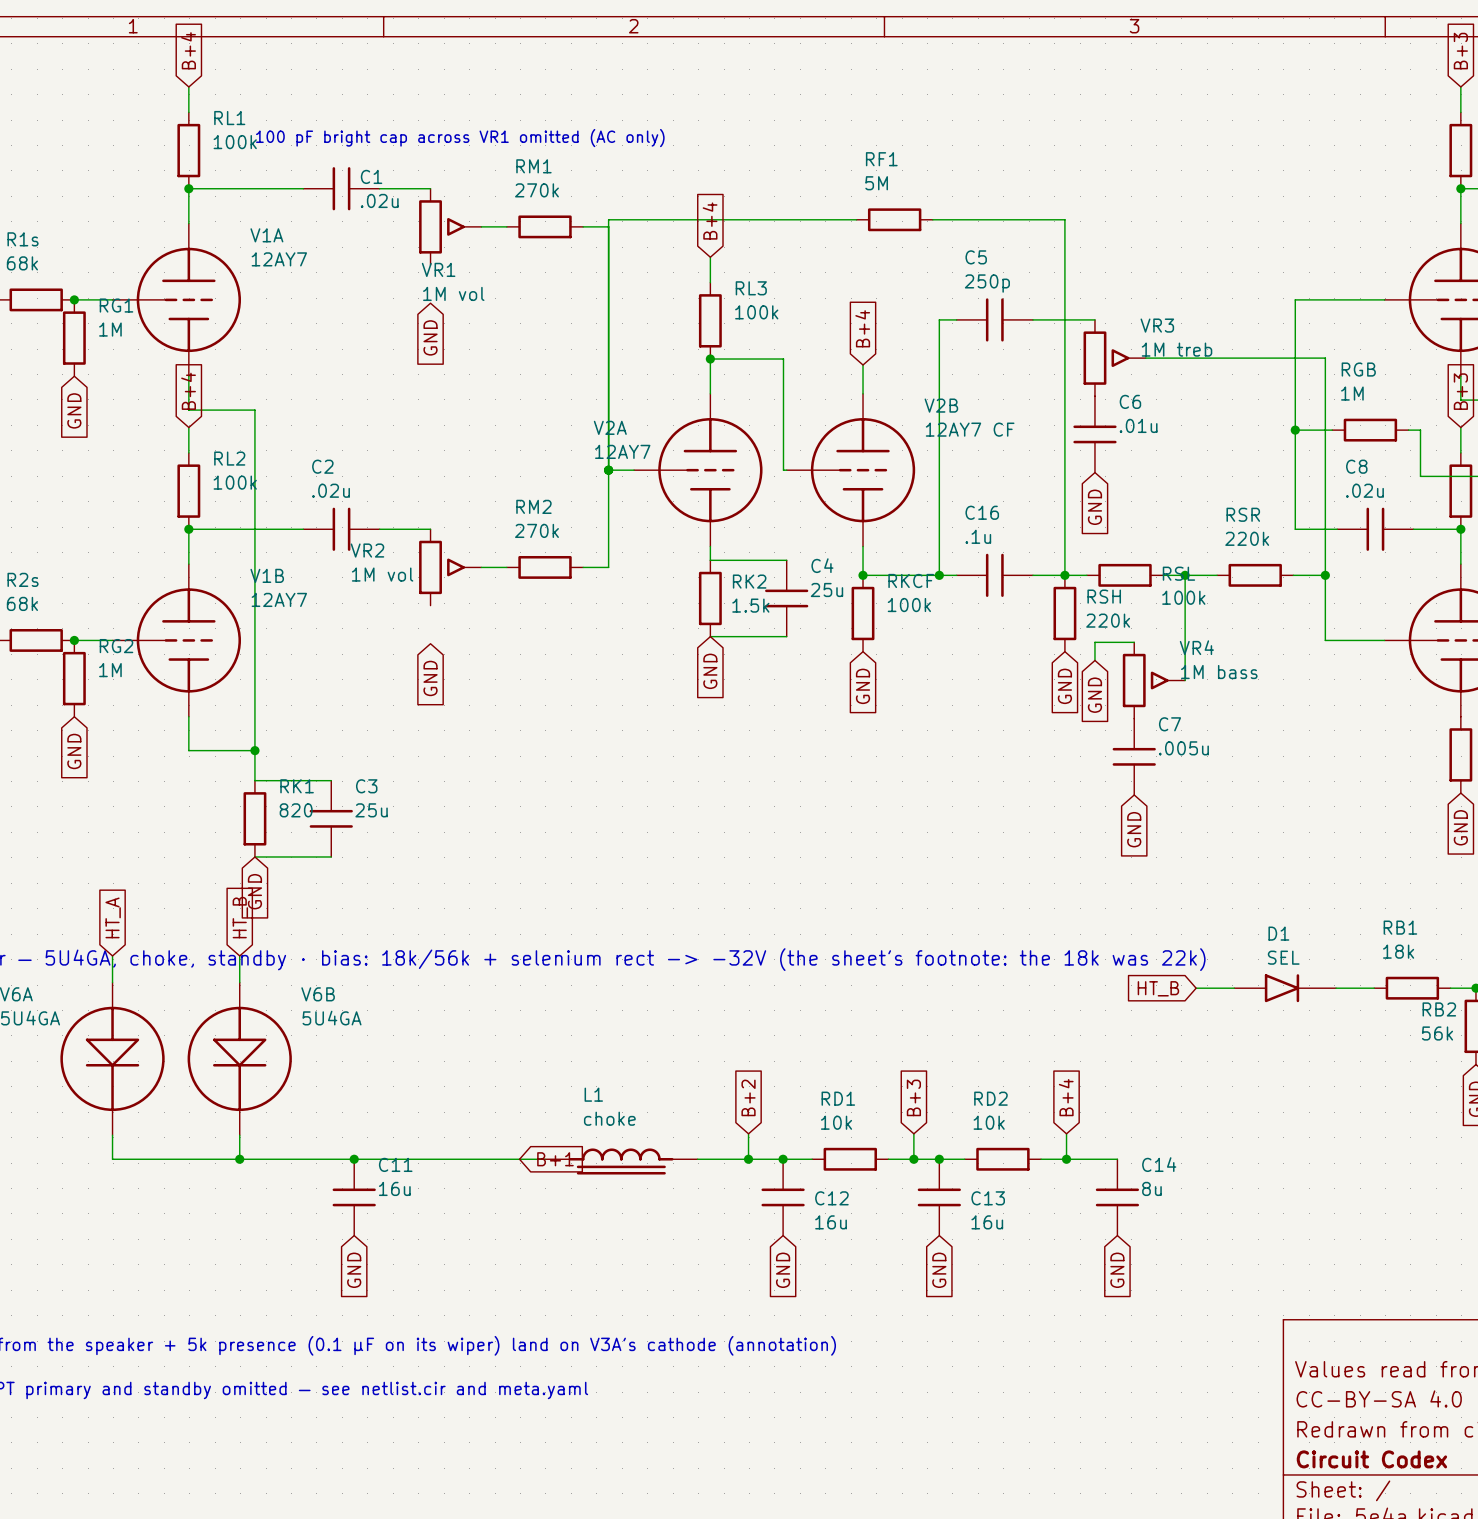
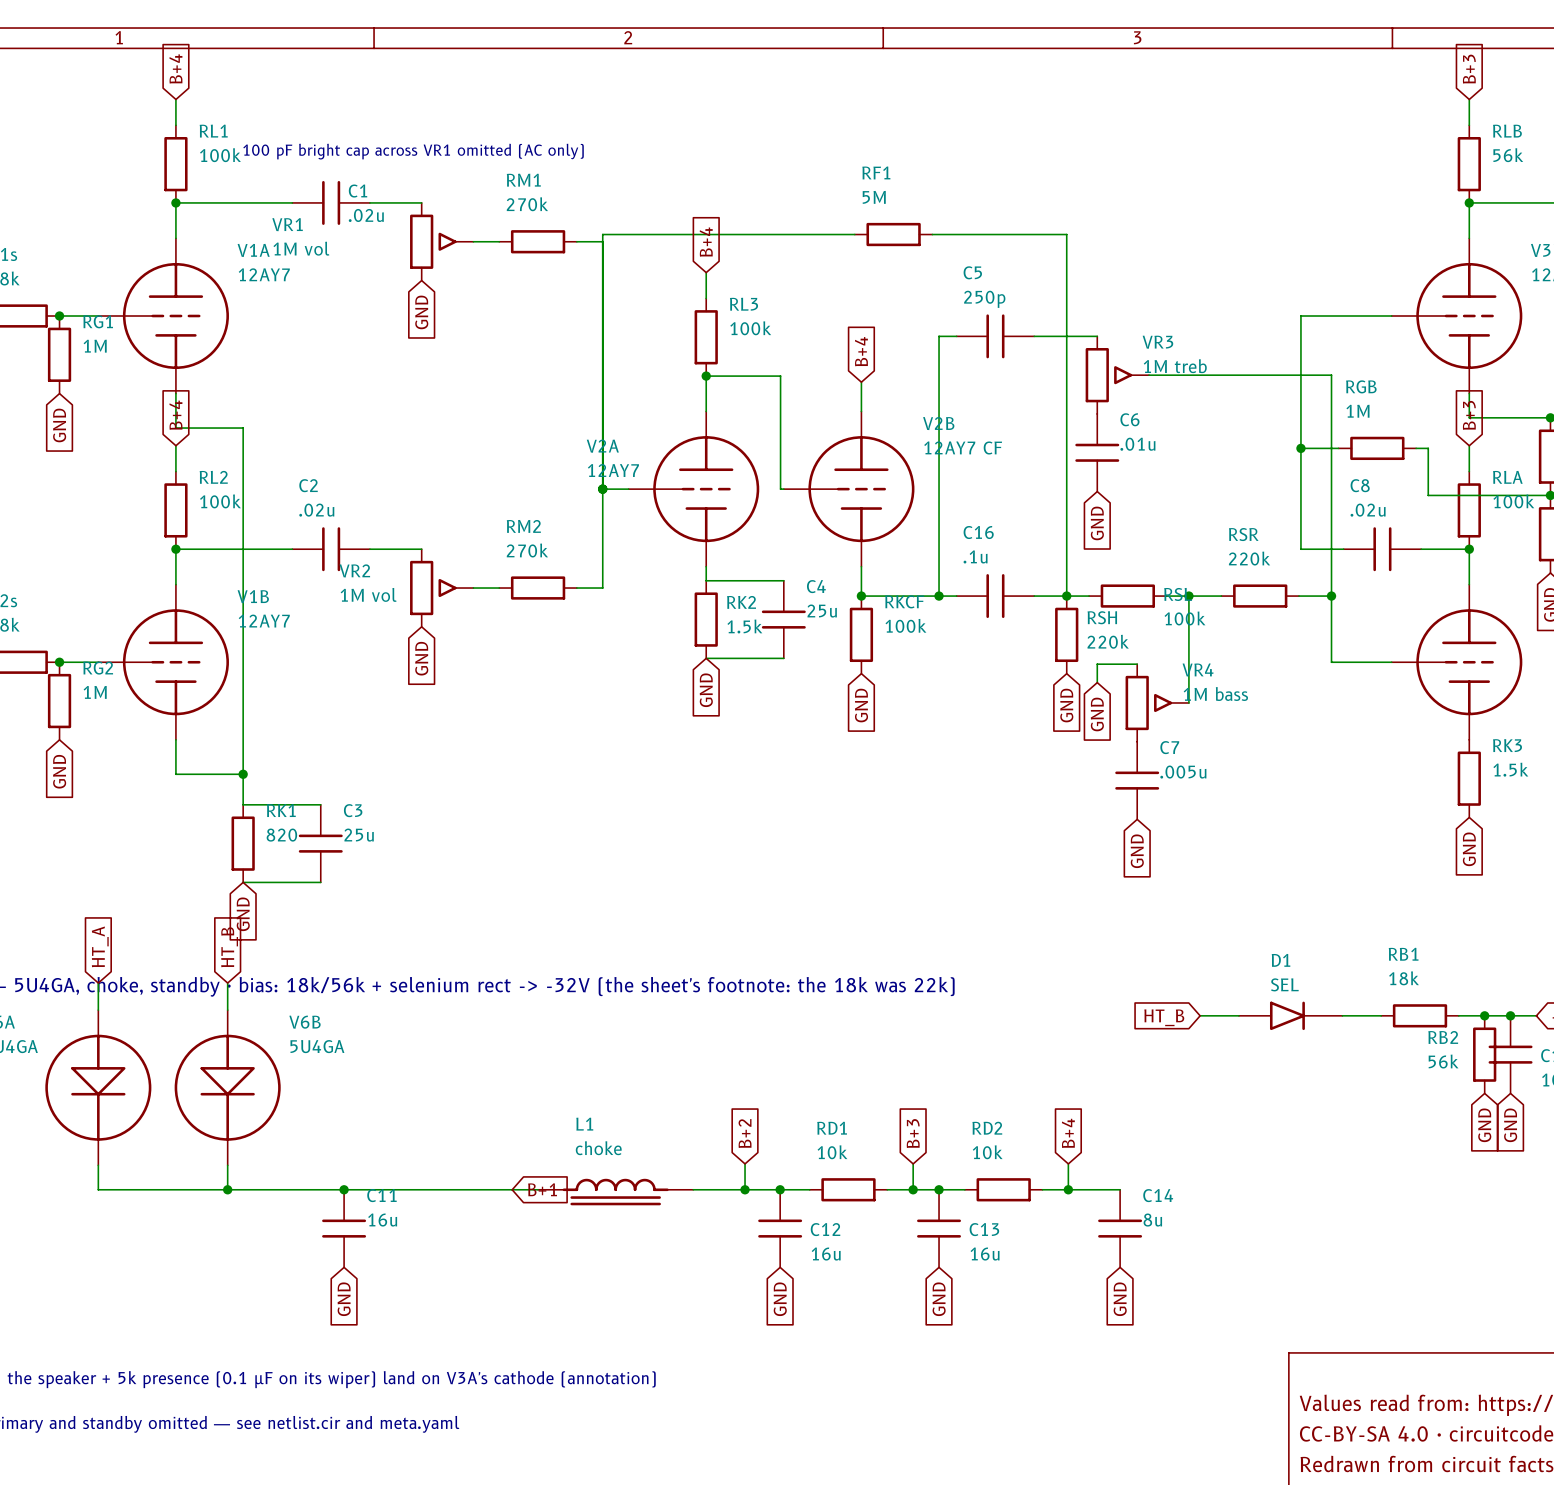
VR1 name position: VR1 (438, 269) -> VR1 (287, 224)
VR1 value position: 1M vol (453, 293) -> 1M vol (301, 248)
global label position: GND (430, 337) -> GND (421, 312)
global label position: GND (430, 678) -> GND (421, 658)

